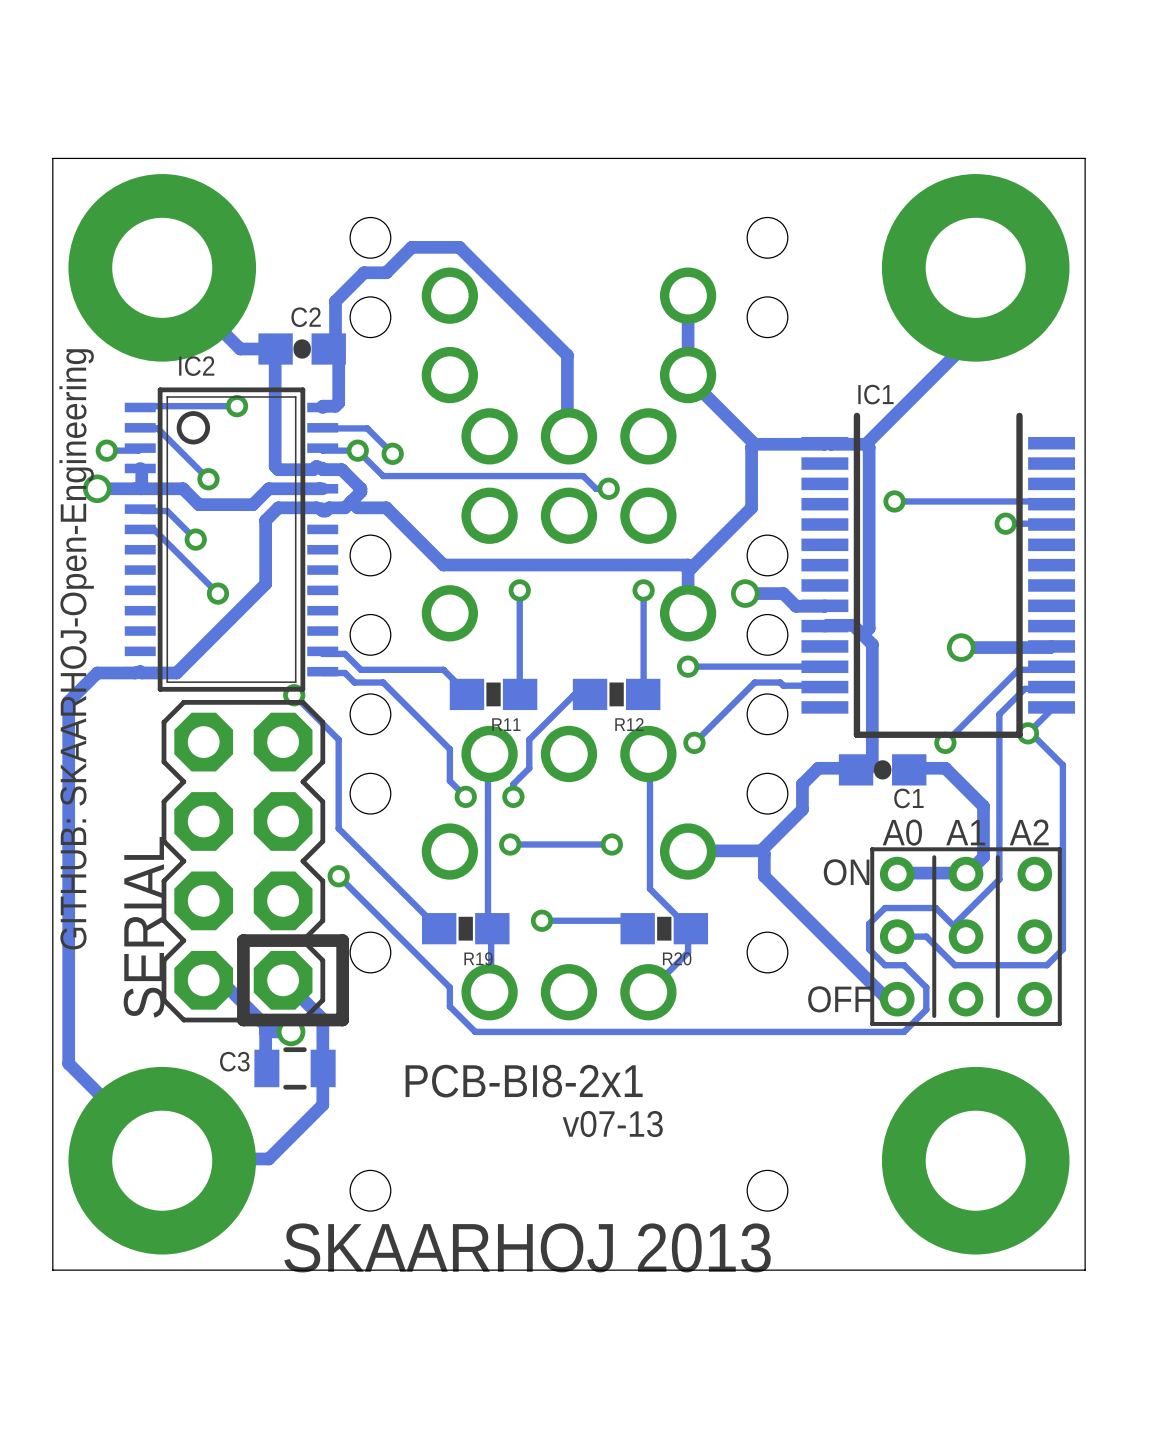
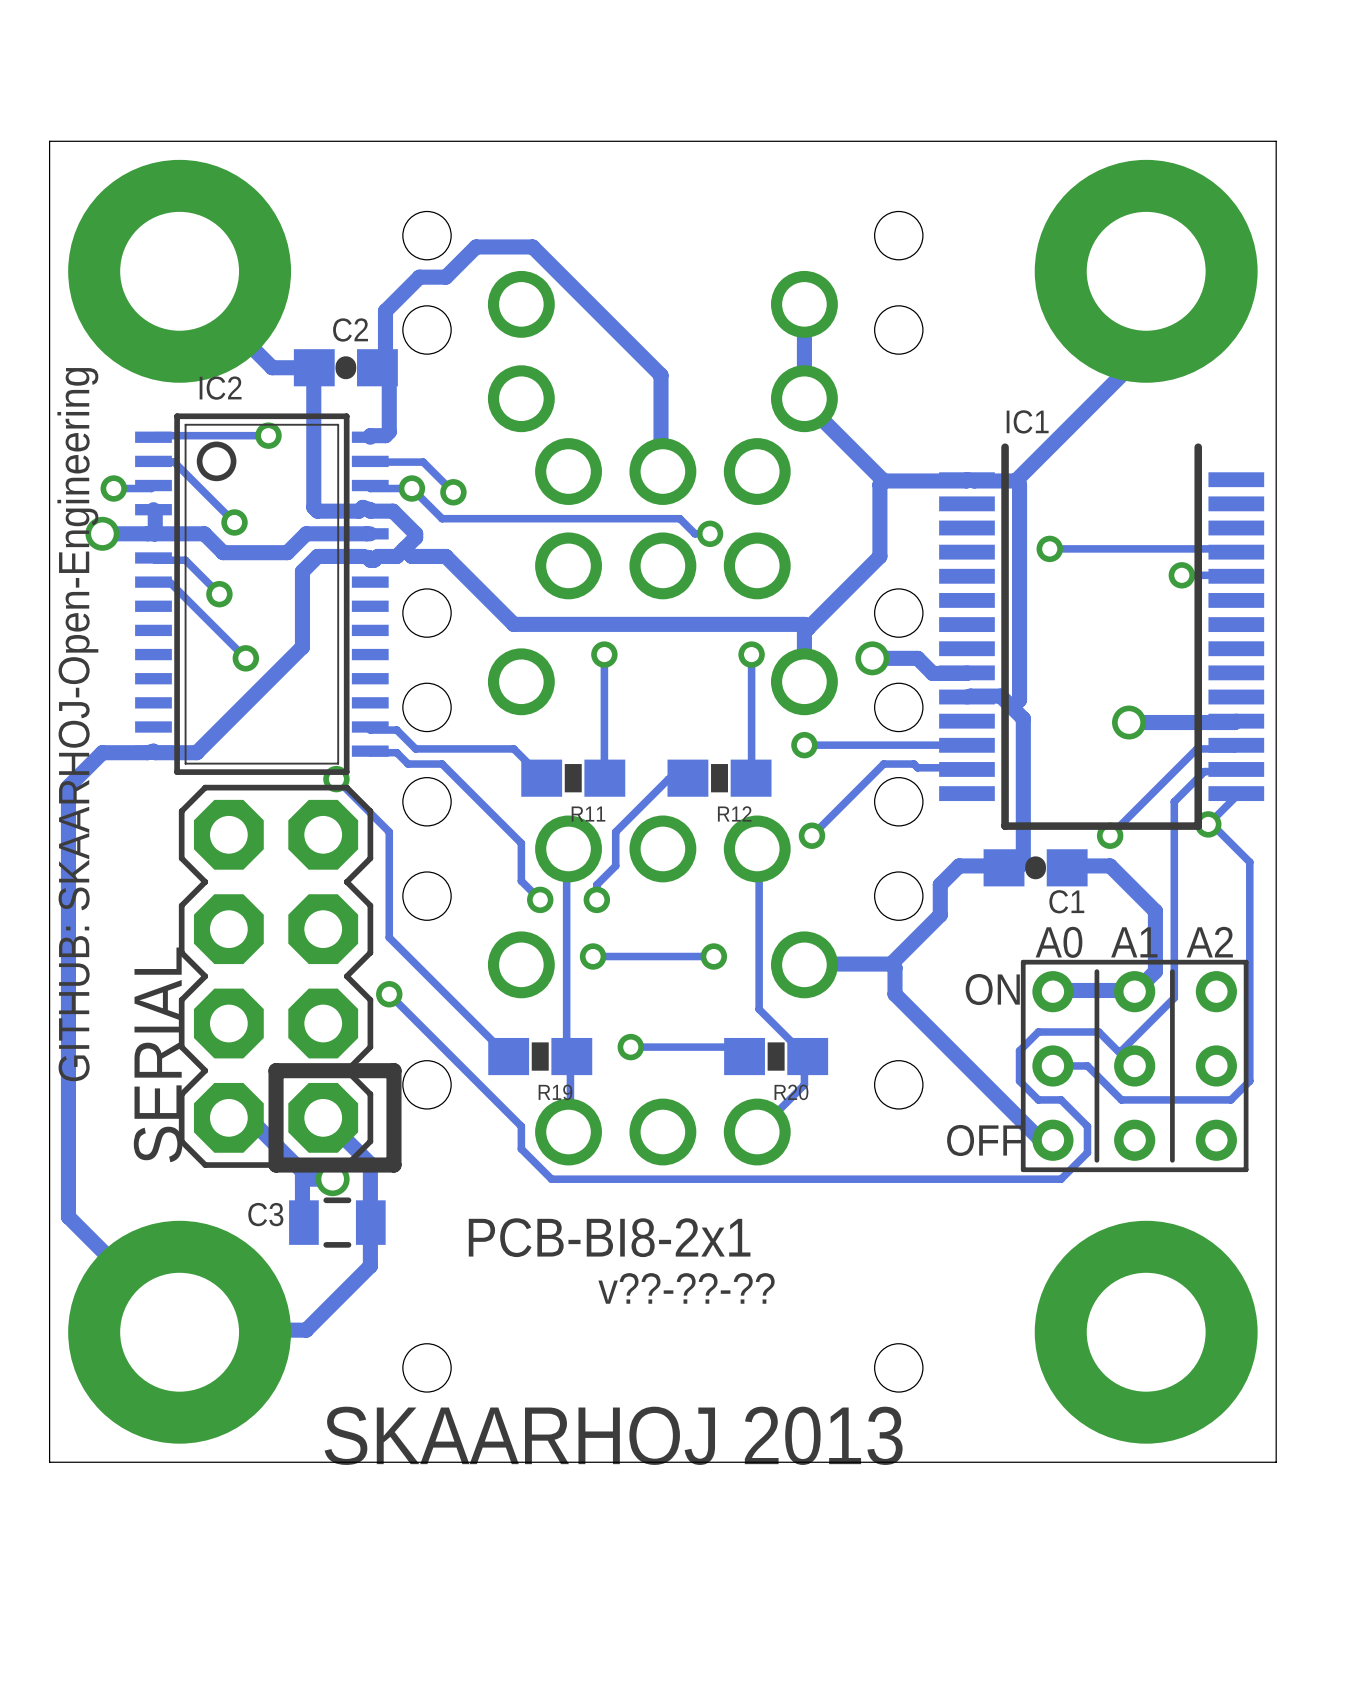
text: v07-13 (612, 1124) -> v??-??-?? (686, 1288)

